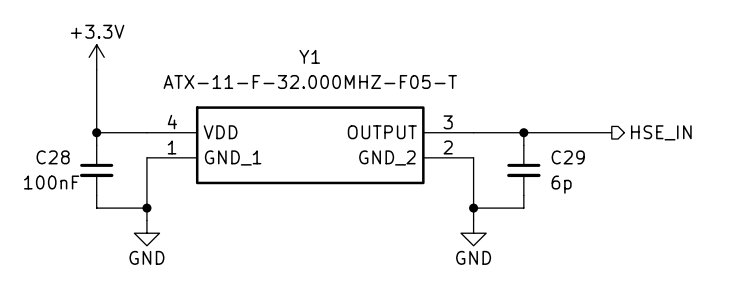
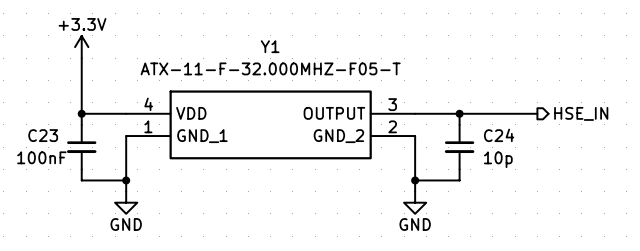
C28 name: C28 (53, 157) -> C23 (43, 135)
C29 name: C29 (568, 157) -> C24 (499, 135)
C29 value: 6p (561, 184) -> 10p (498, 159)

